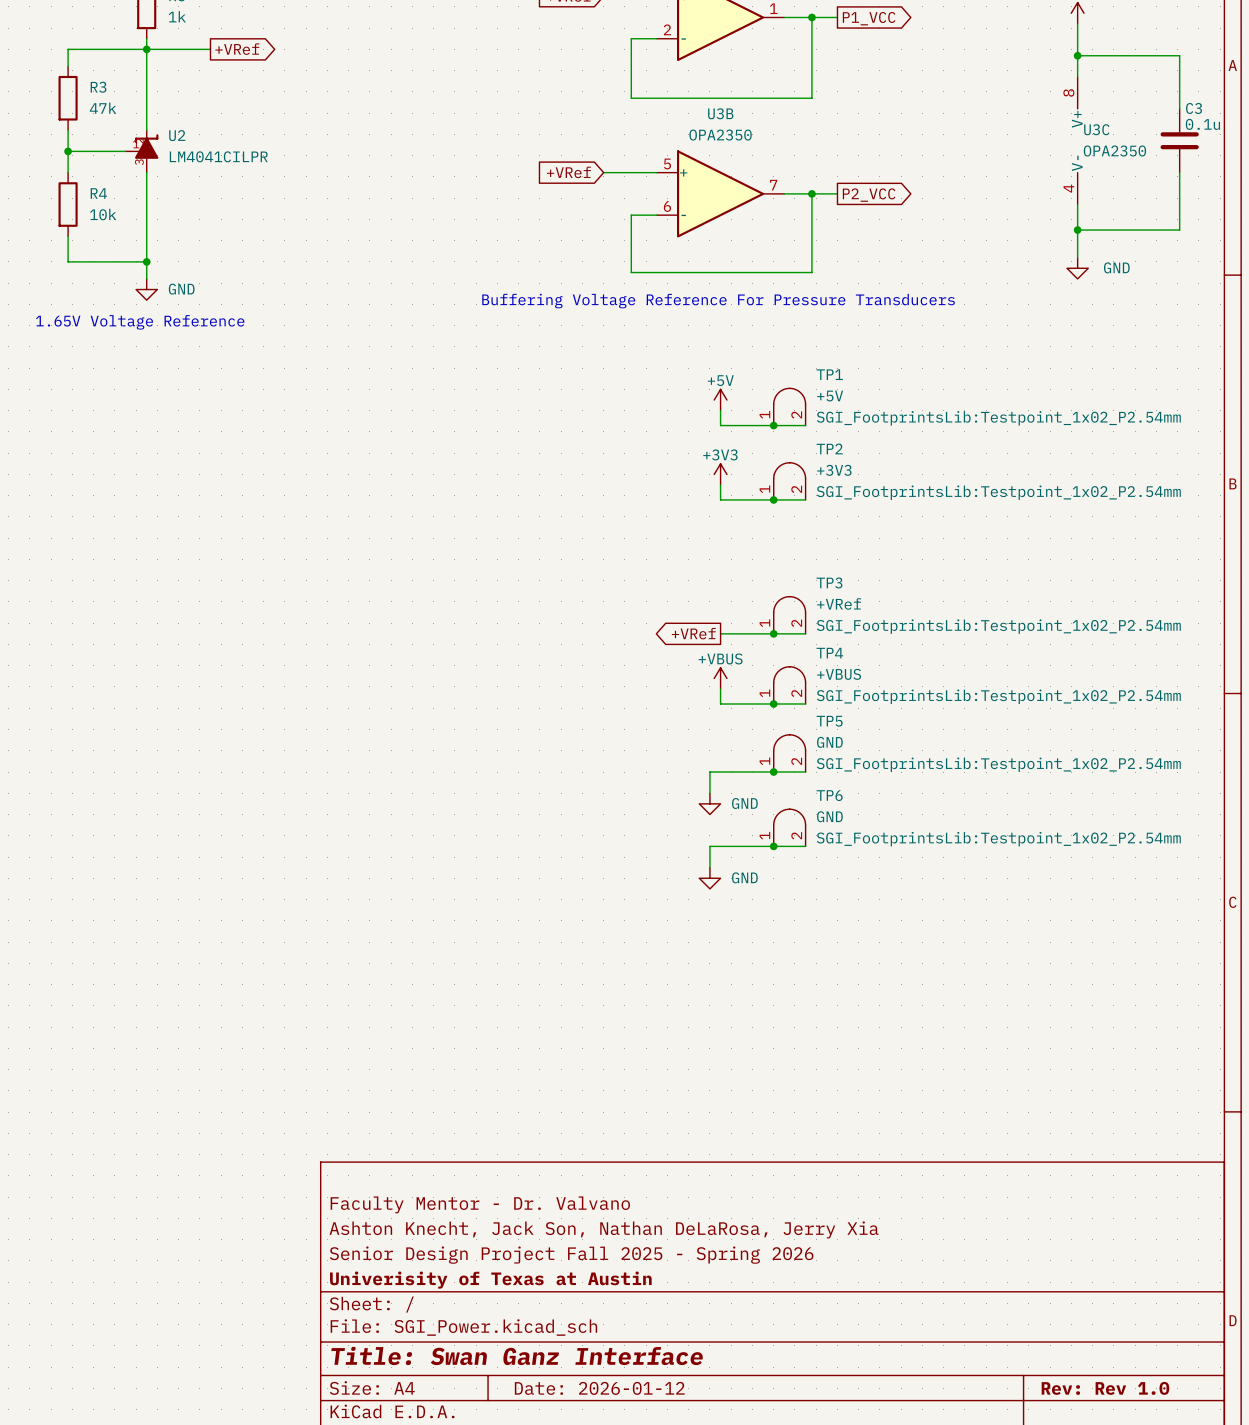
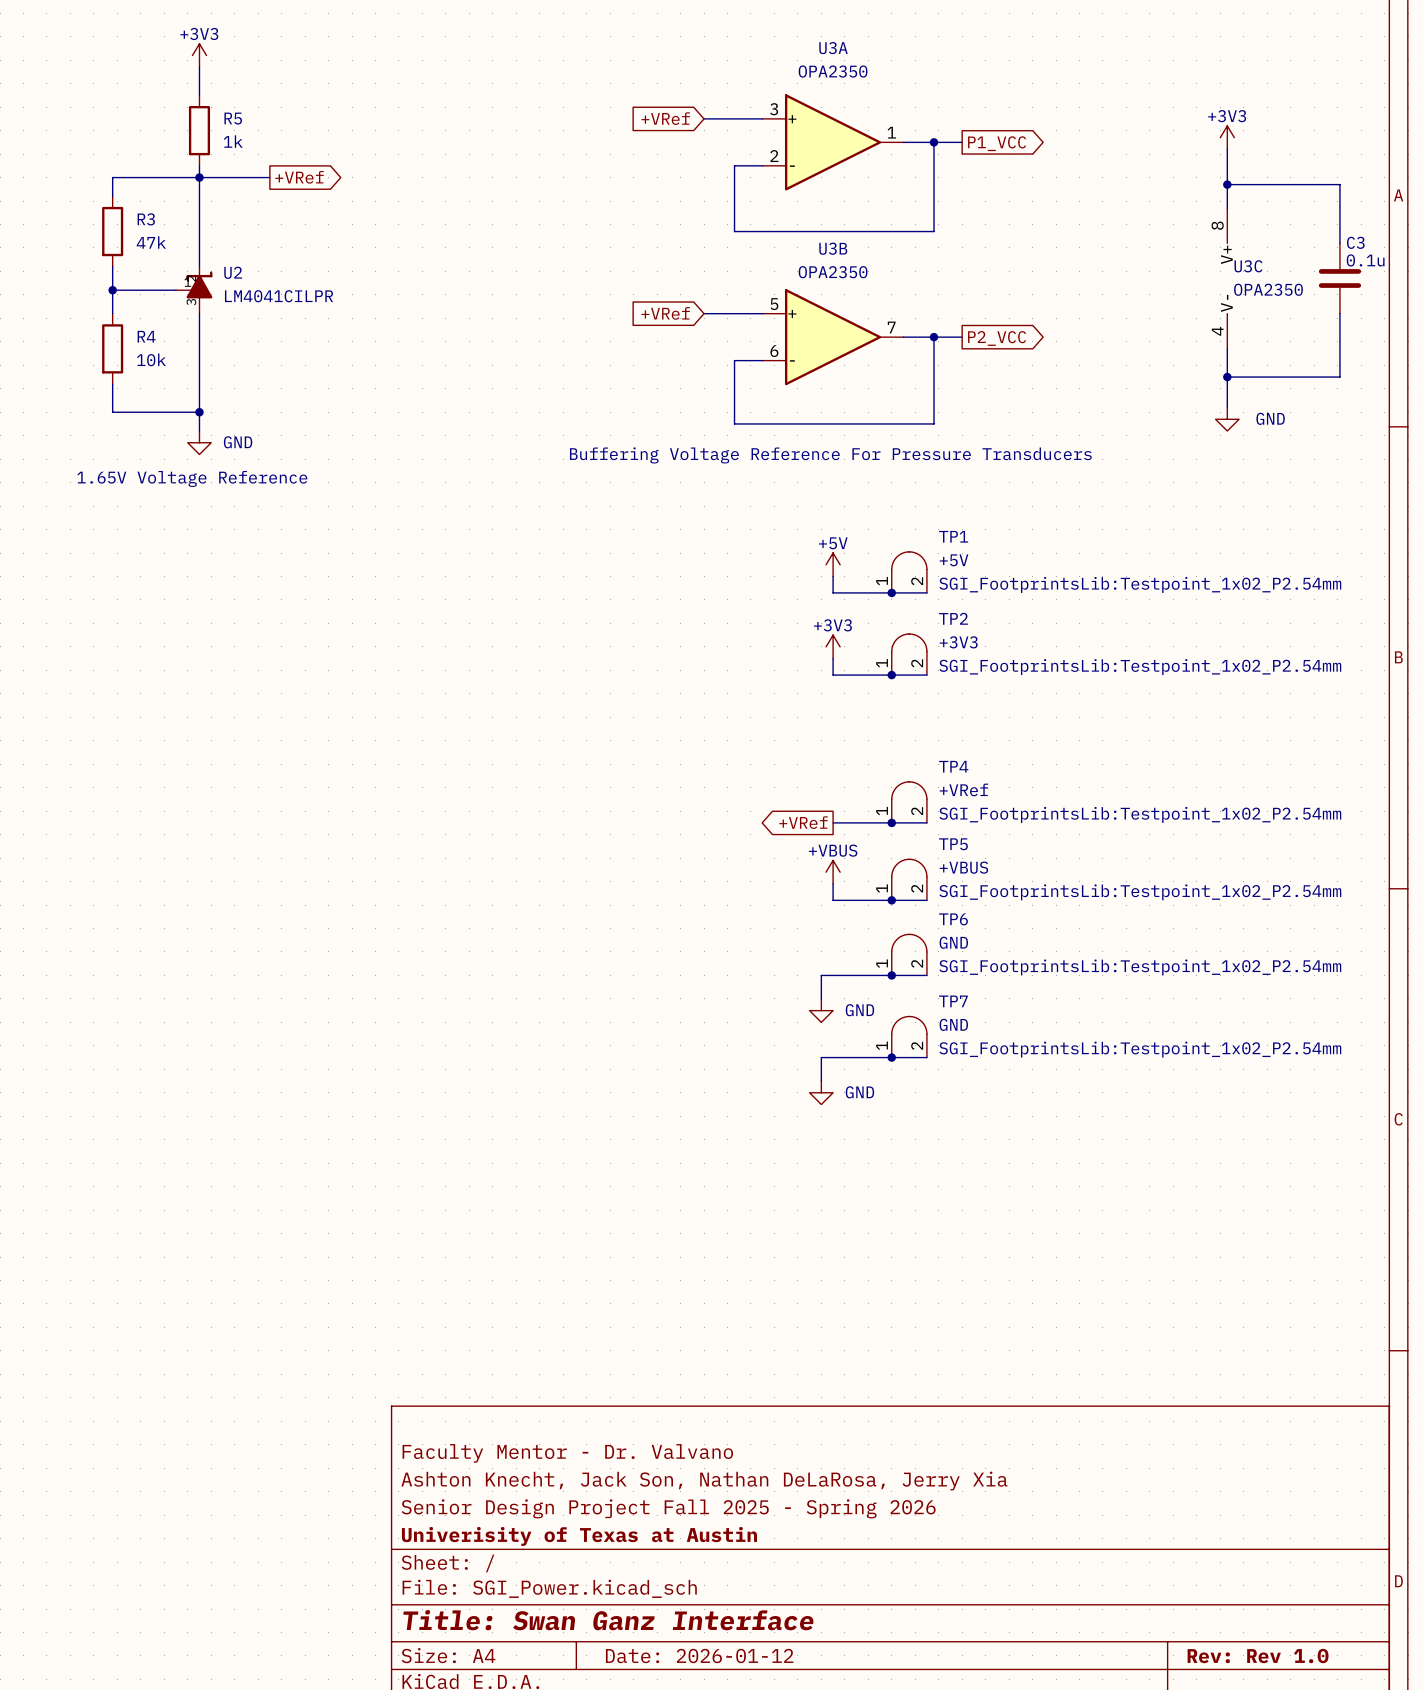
TP3 name: TP3 (829, 582) -> TP4 (953, 766)
TP4 name: TP4 (829, 653) -> TP5 (953, 844)
TP5 name: TP5 (829, 721) -> TP6 (953, 919)
TP6 name: TP6 (829, 795) -> TP7 (953, 1001)

